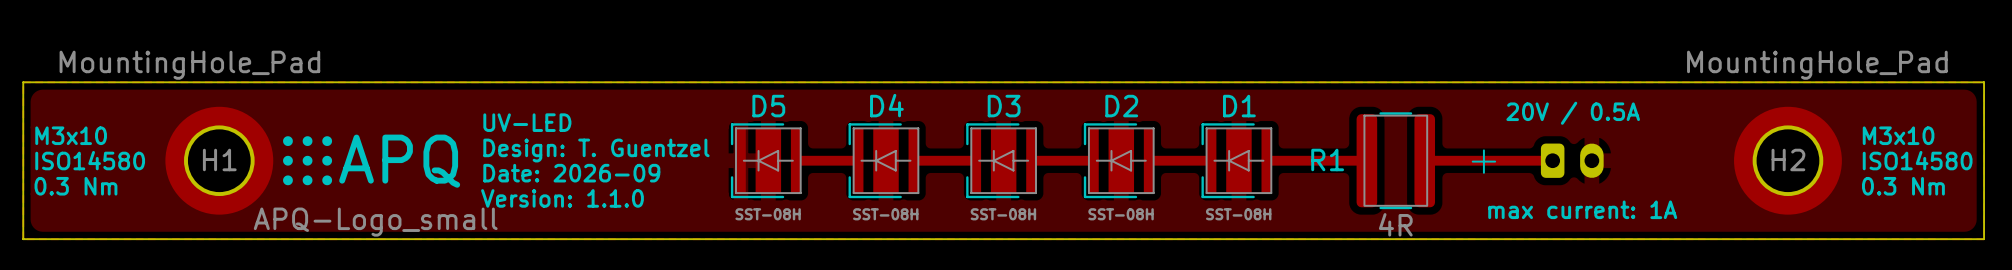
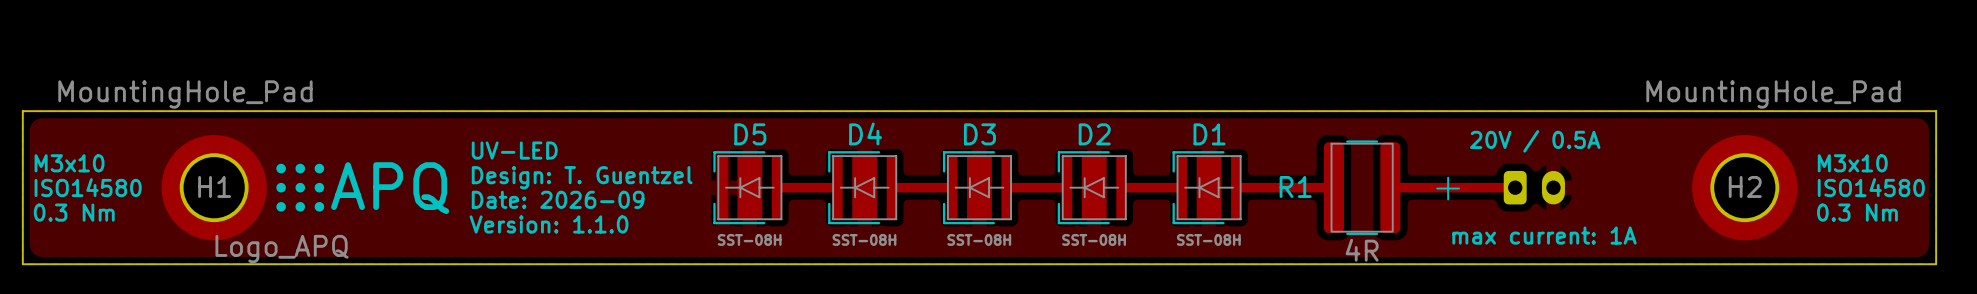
drawing shape: [253, 134, 498, 237] -> [215, 162, 450, 264]

